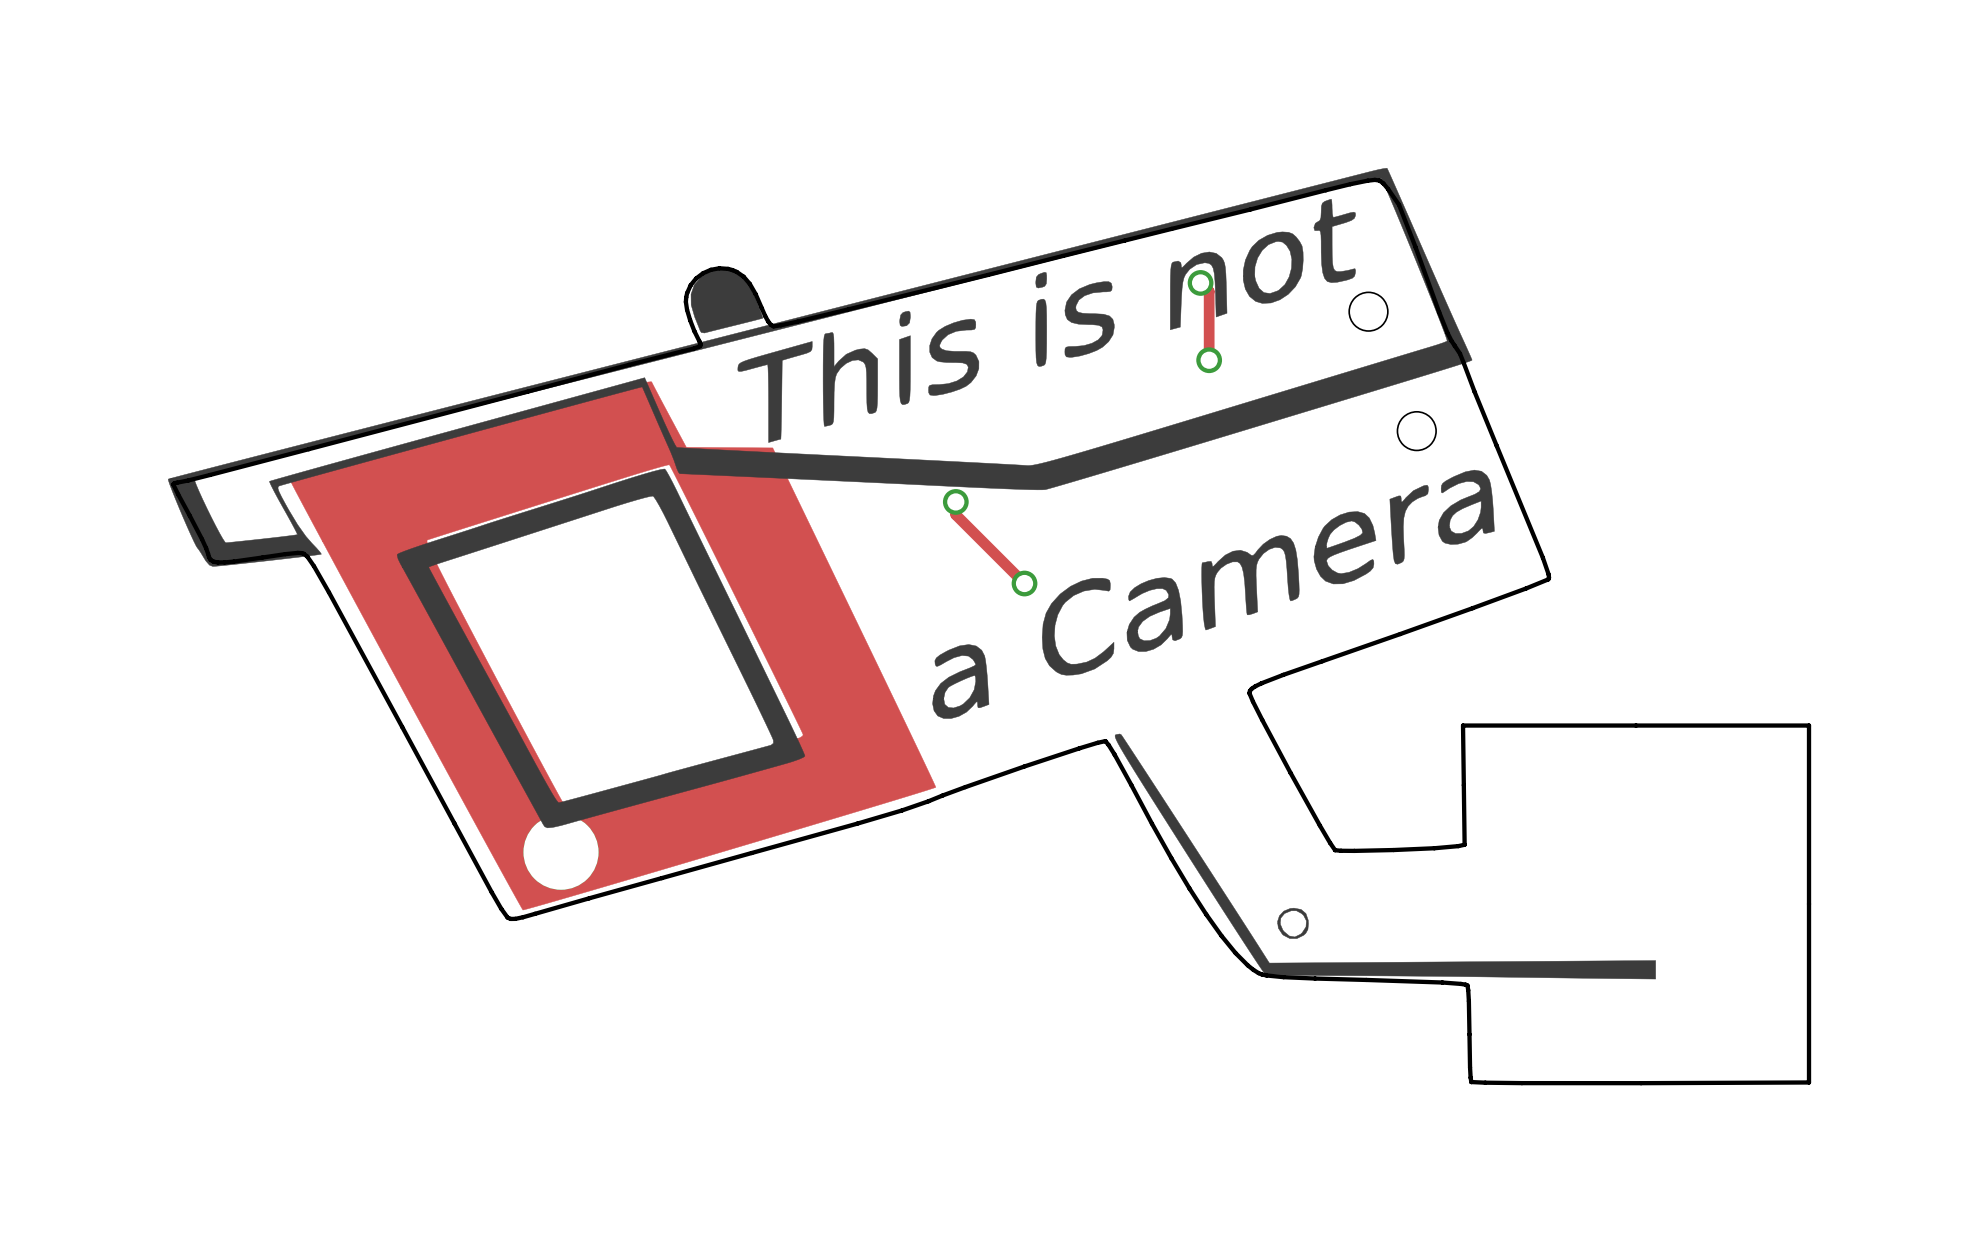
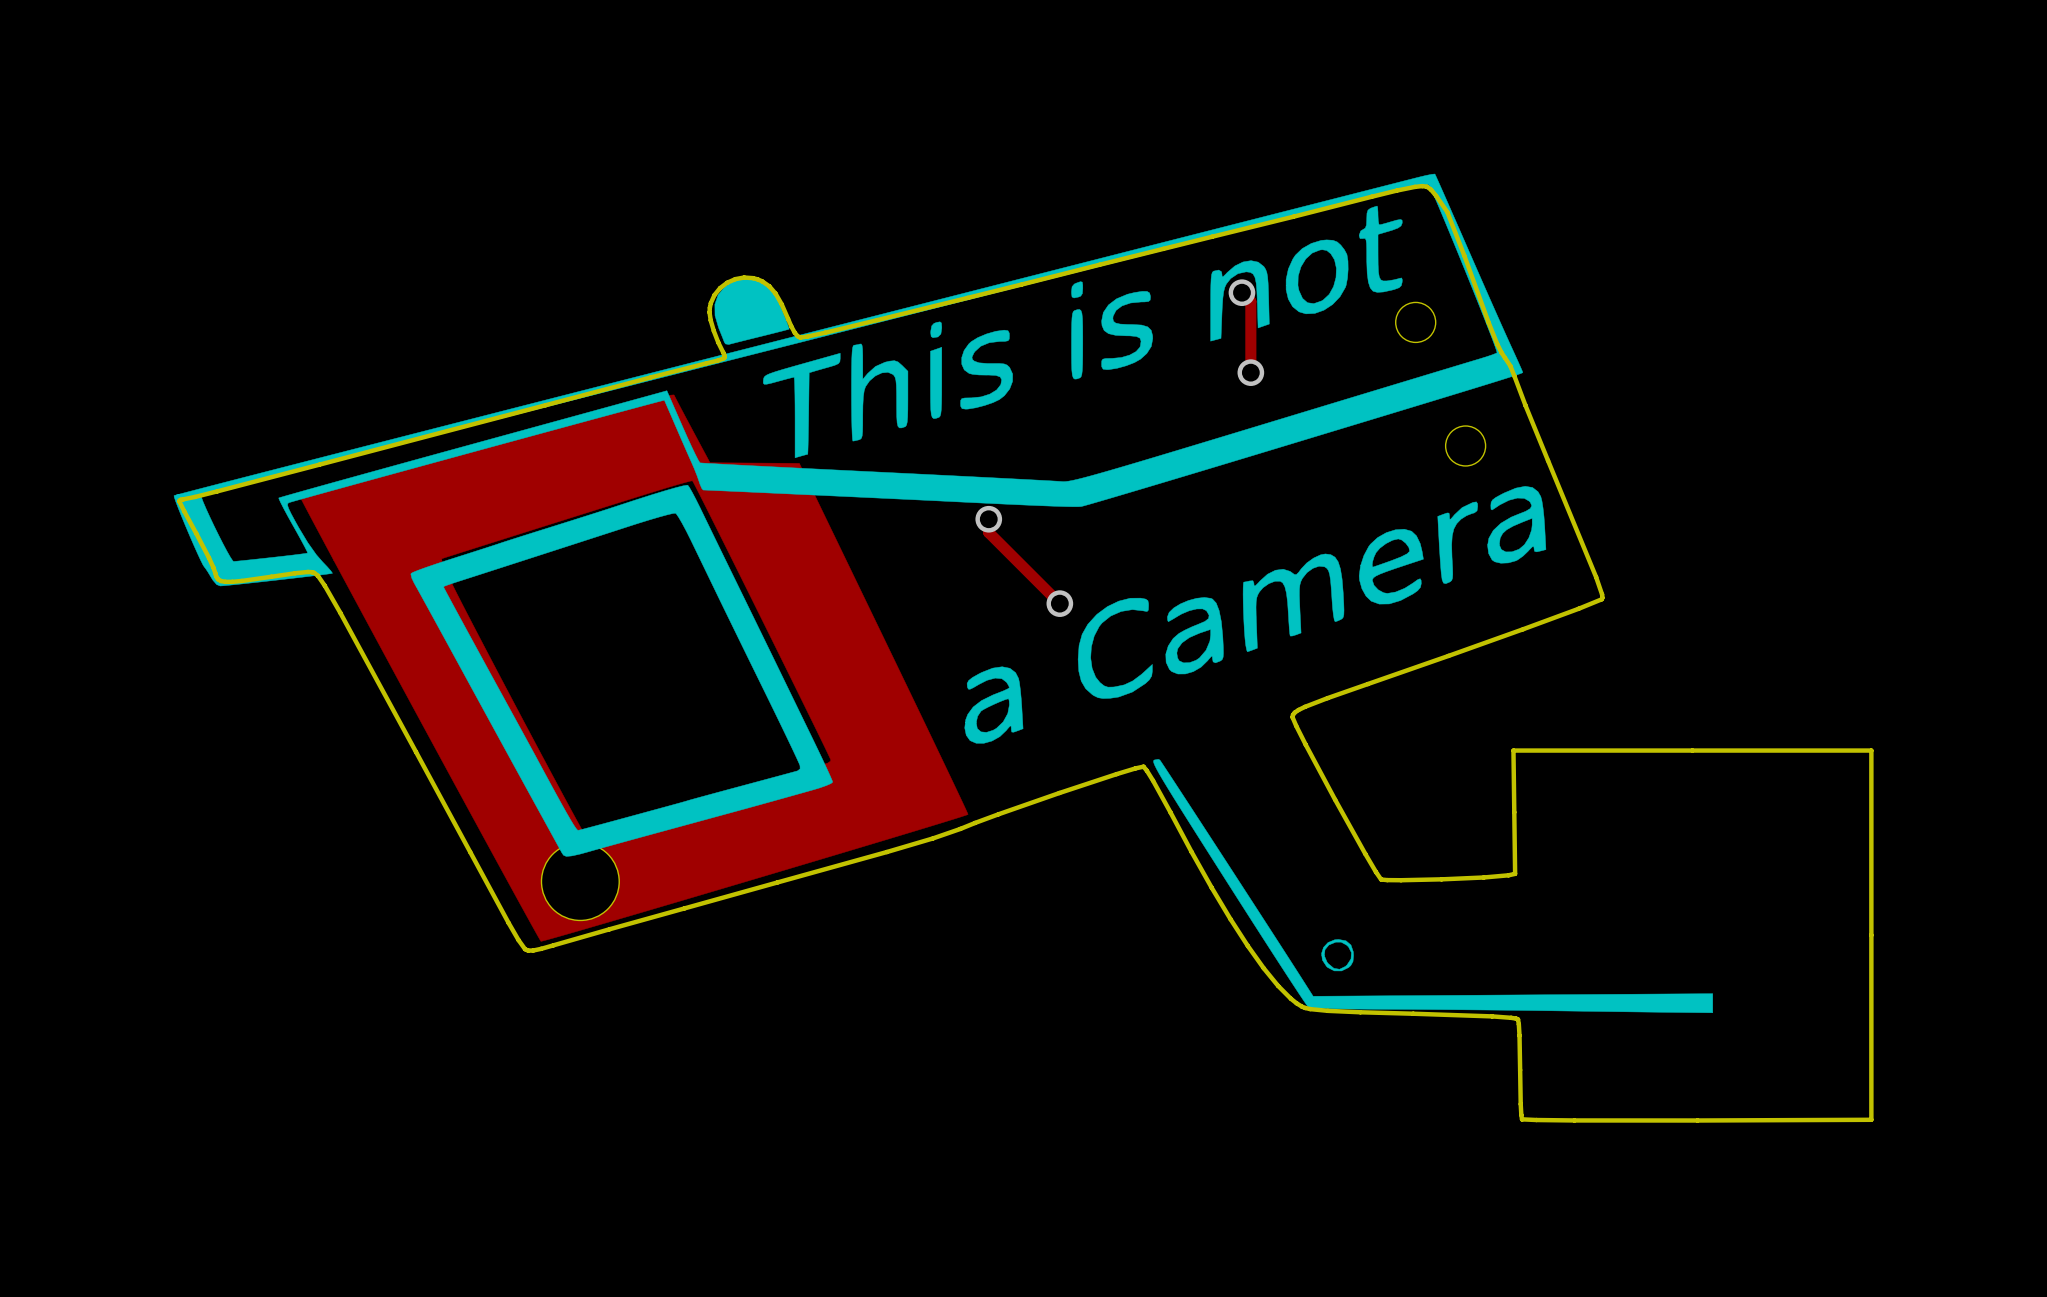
part footprint: [523, 814, 599, 890] -> [541, 842, 620, 921]

